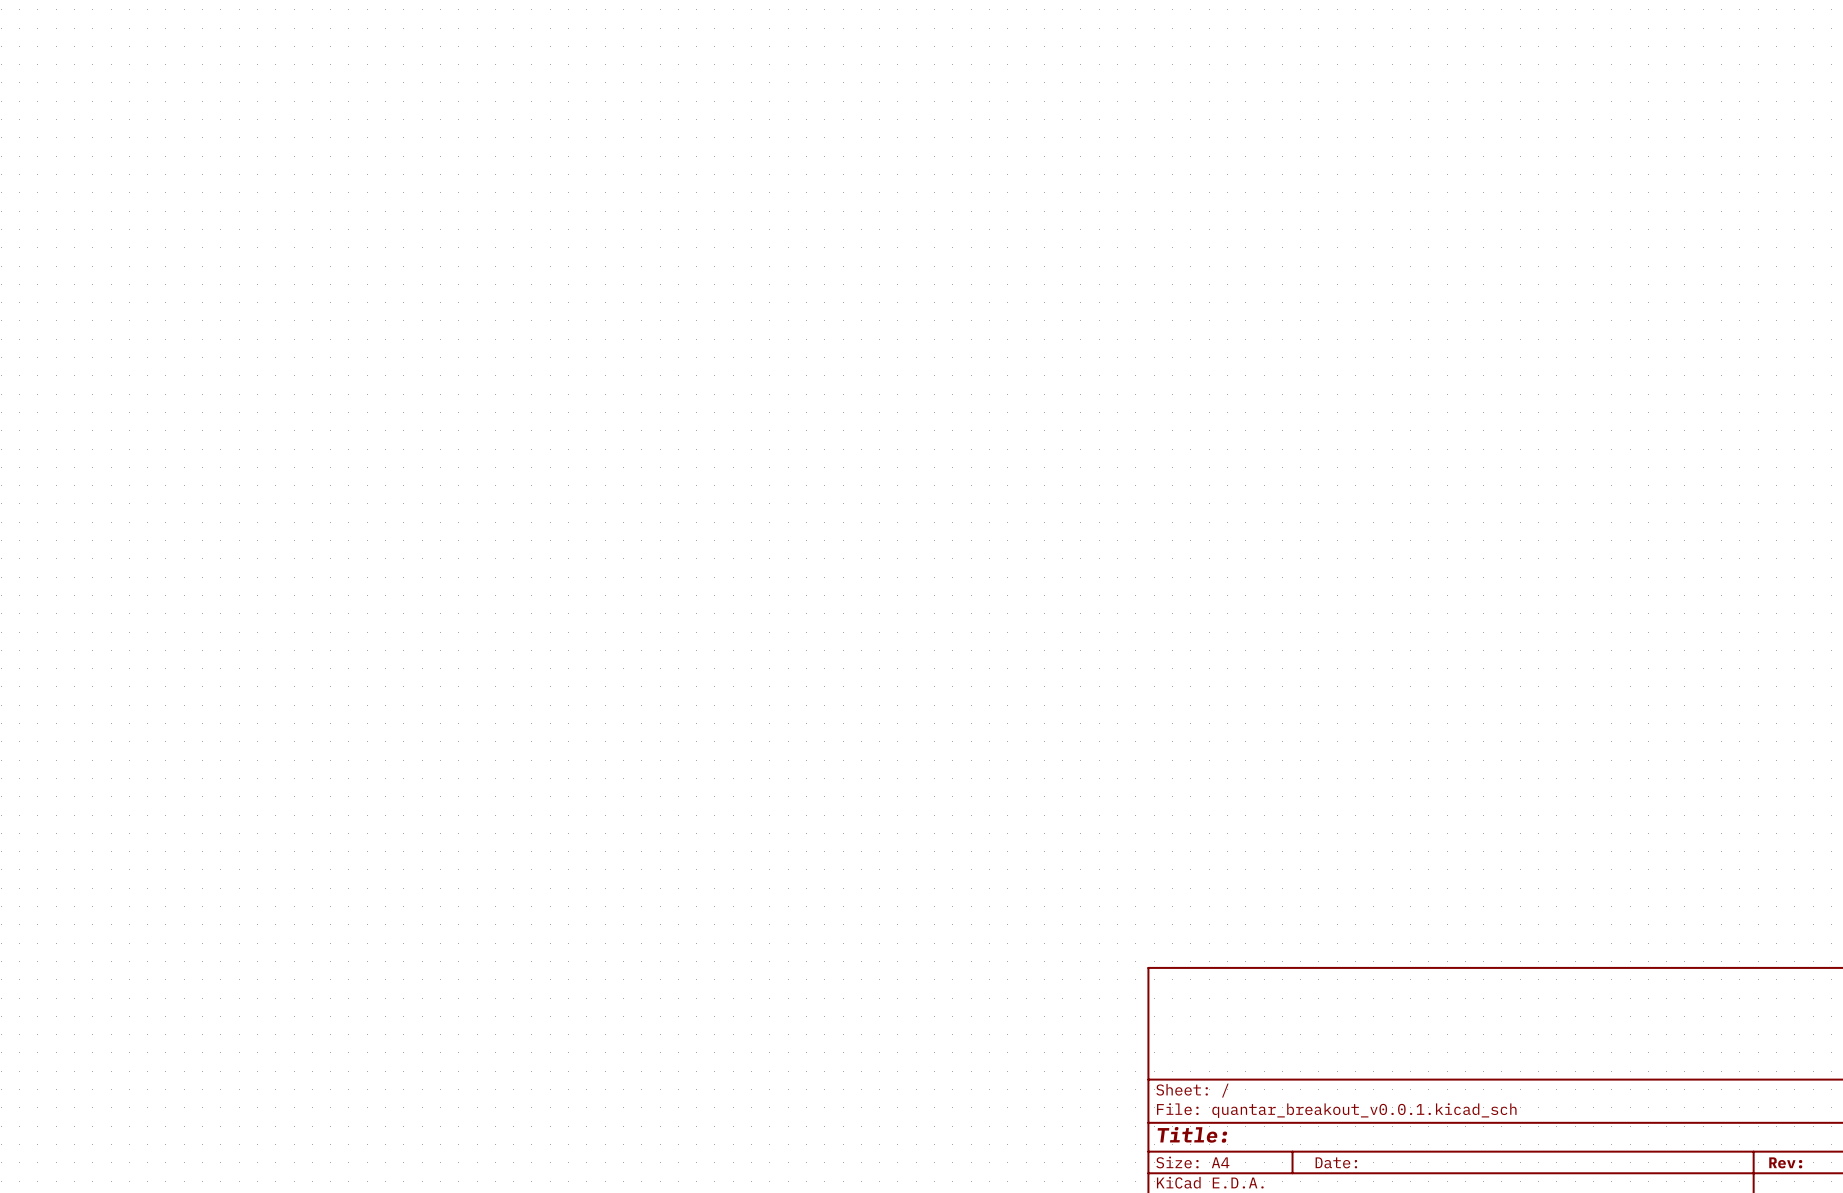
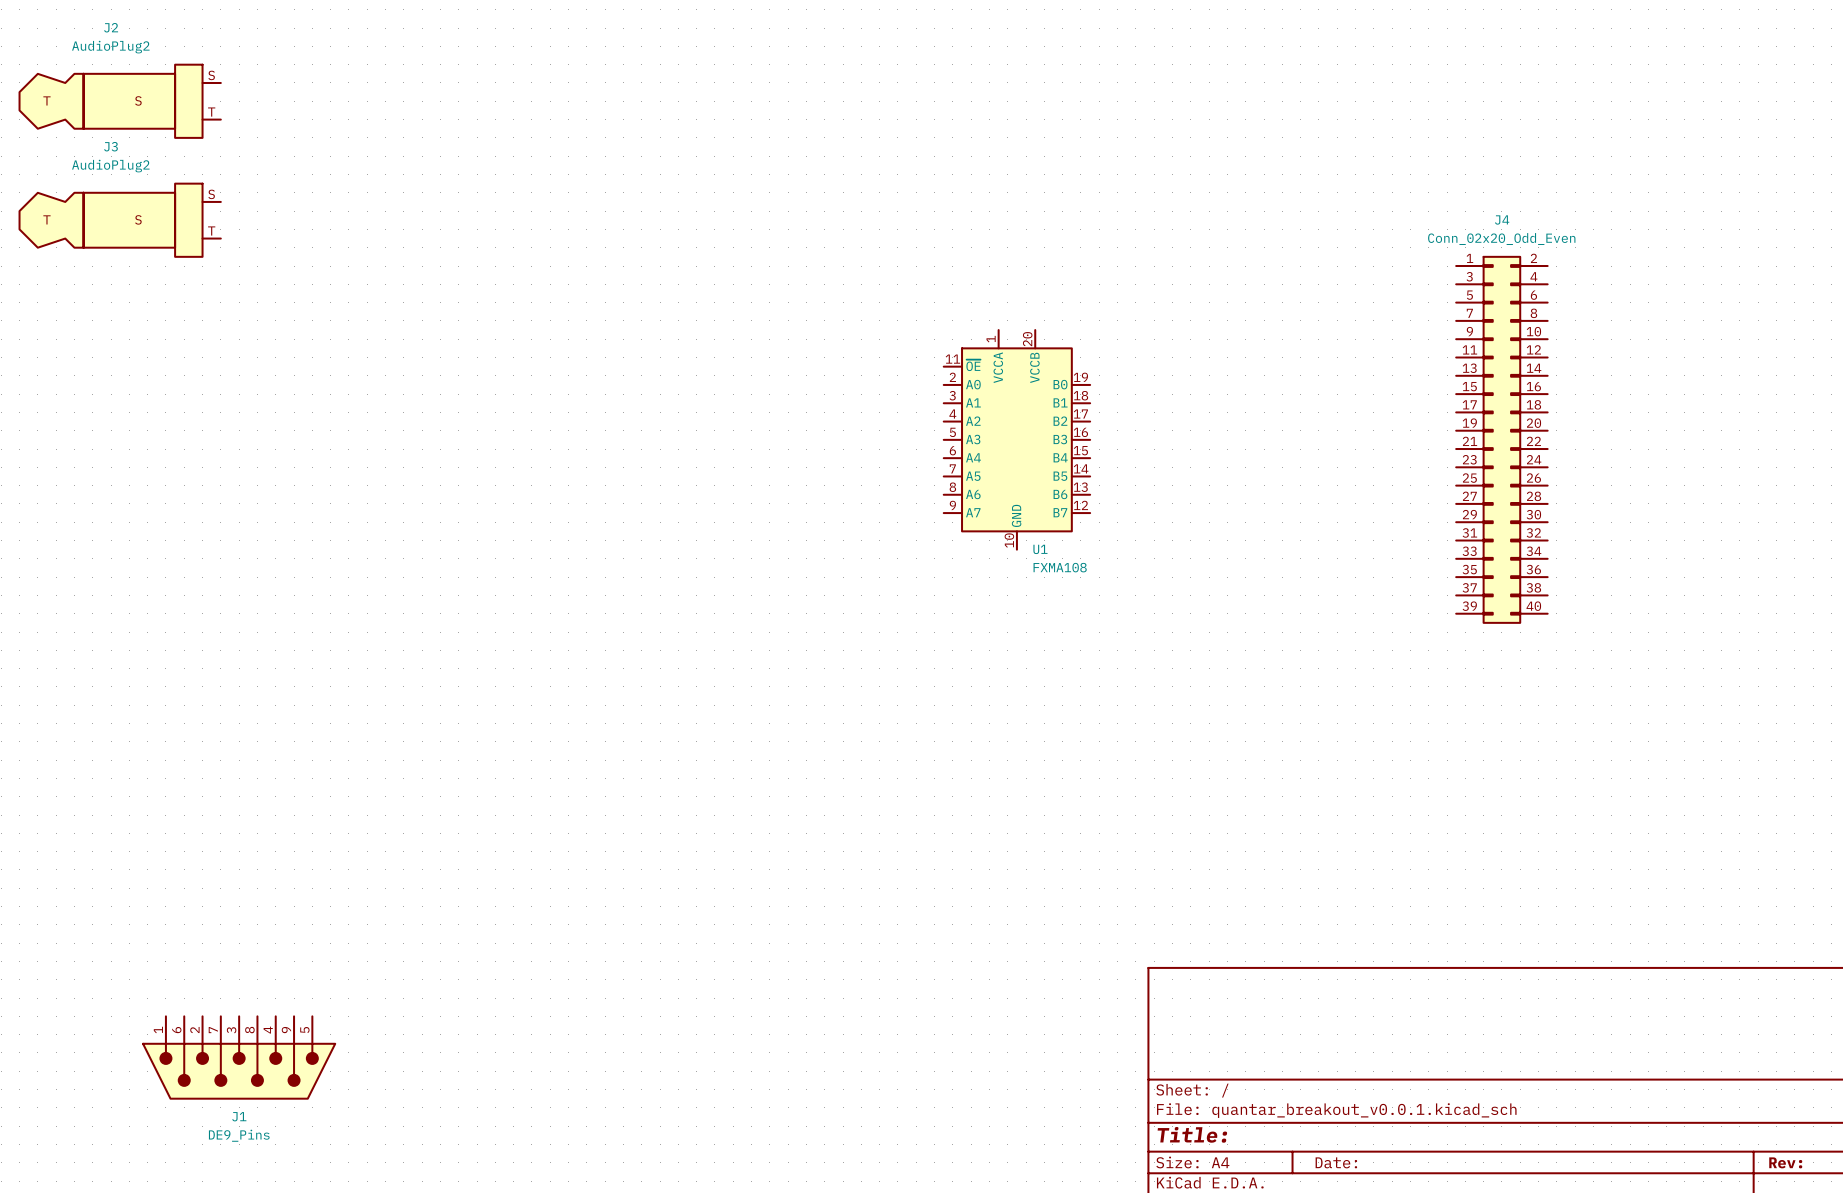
J2: none -> AudioPlug2 (119, 101)
J3: none -> AudioPlug2 (119, 220)
U1: none -> FXMA108 (1016, 439)
J4: none -> Conn_02x20_Odd_Even (1501, 439)
J1: none -> DE9_Pins (239, 1057)

